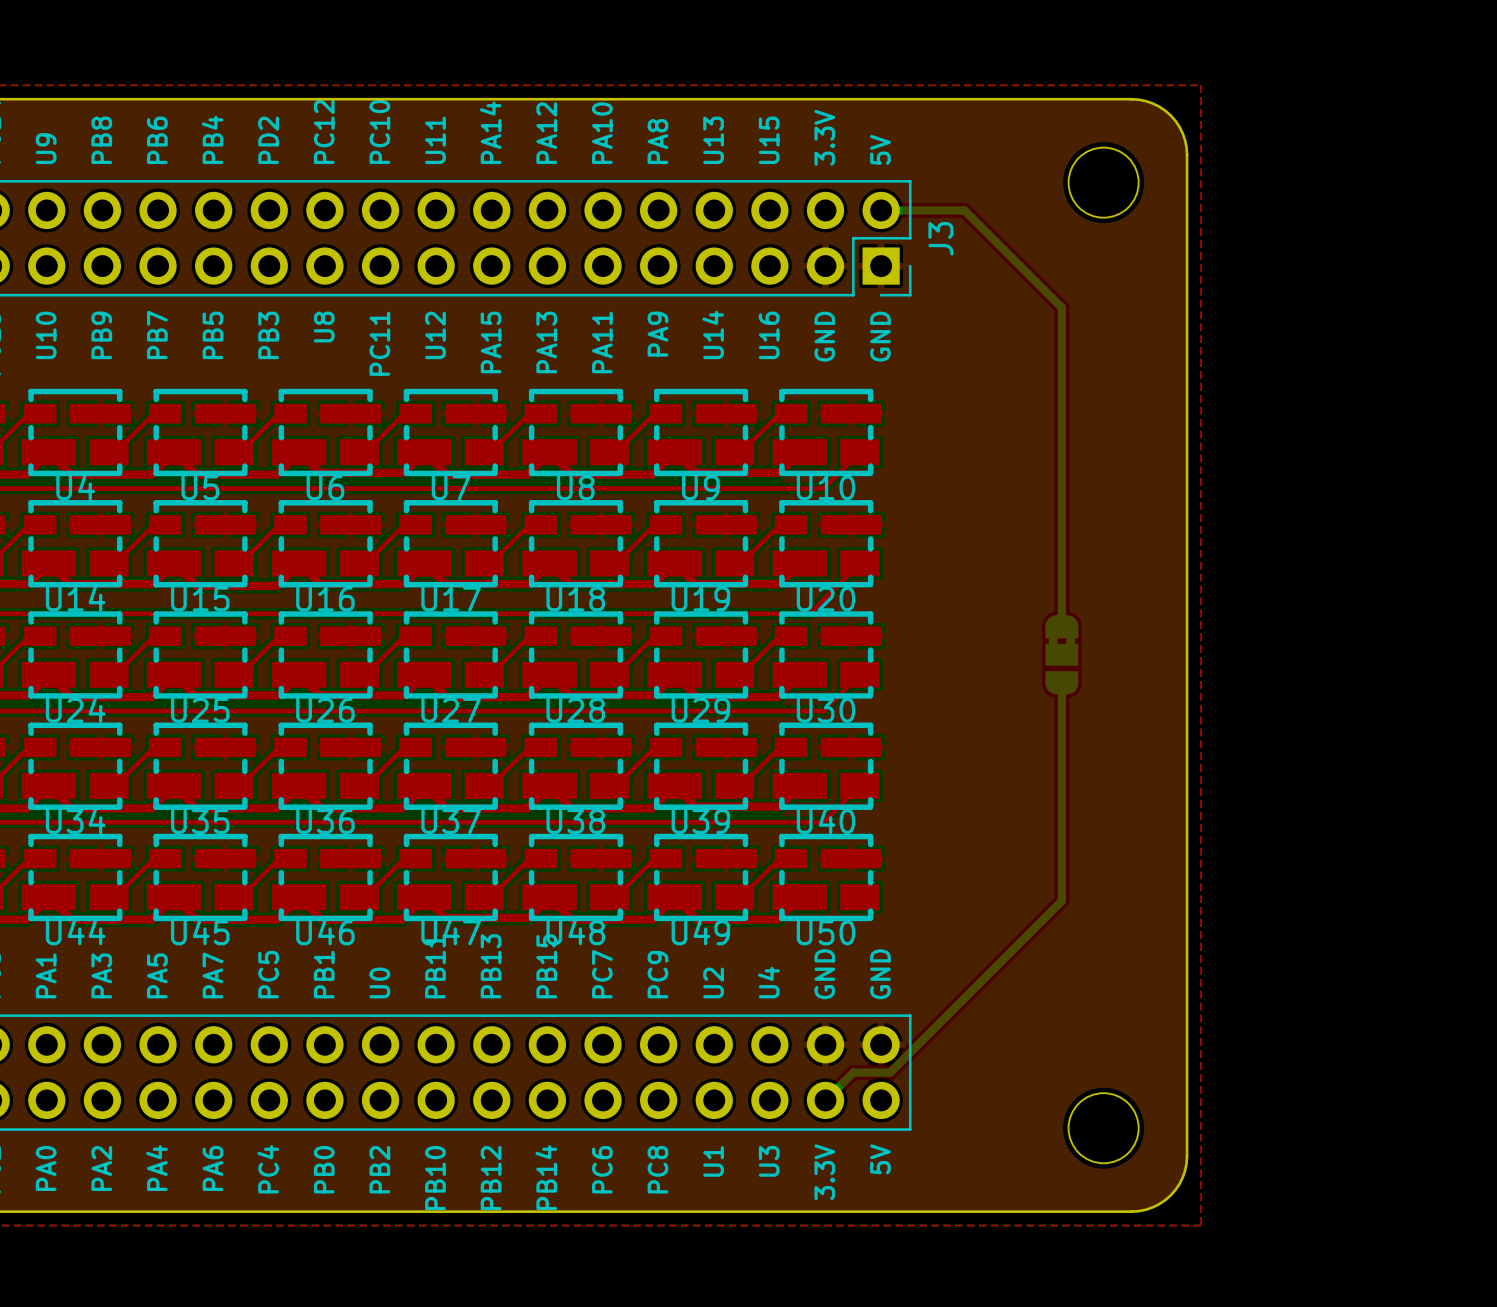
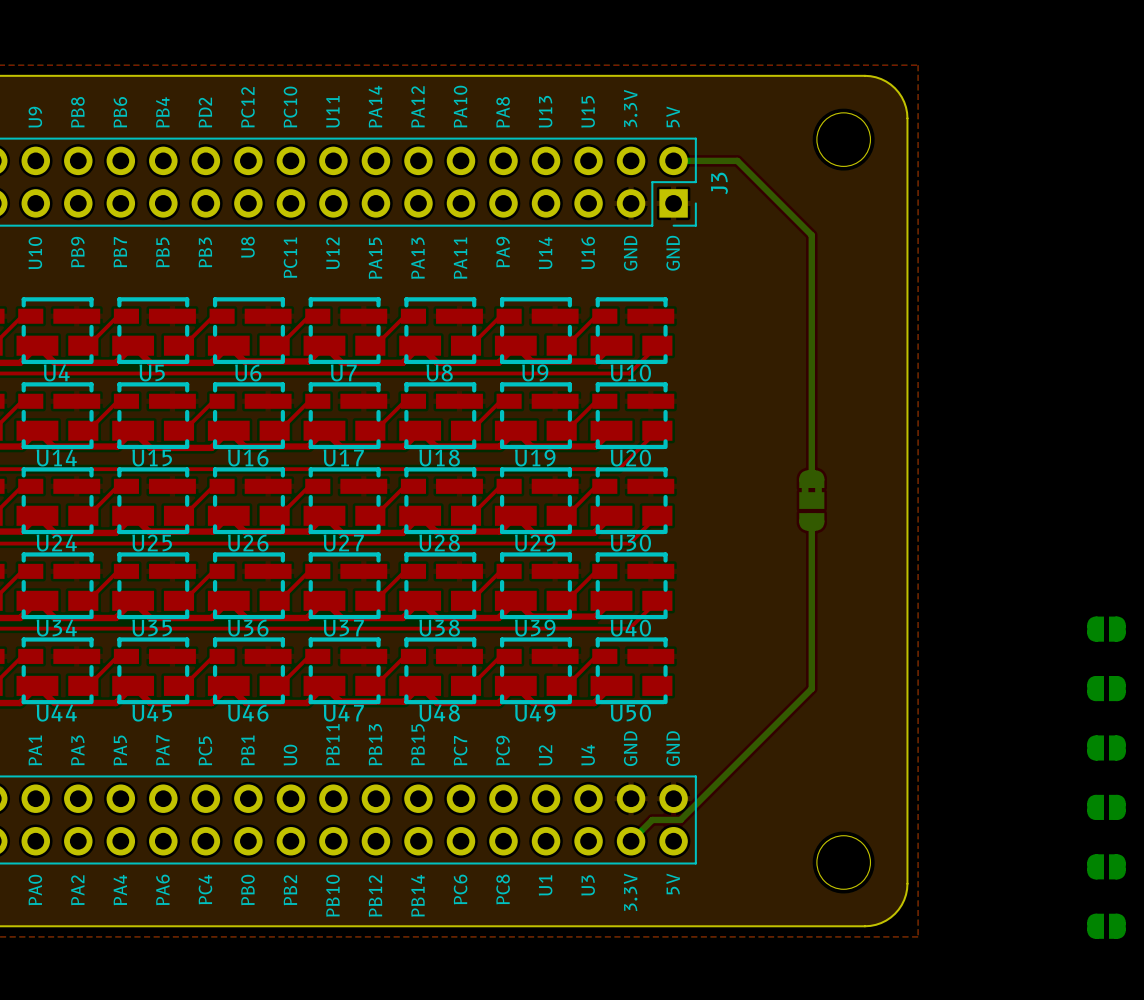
part: none -> (1106, 629)
part: none -> (1106, 688)
part: none -> (1106, 747)
part: none -> (1106, 807)
part: none -> (1106, 866)
part: none -> (1106, 926)

